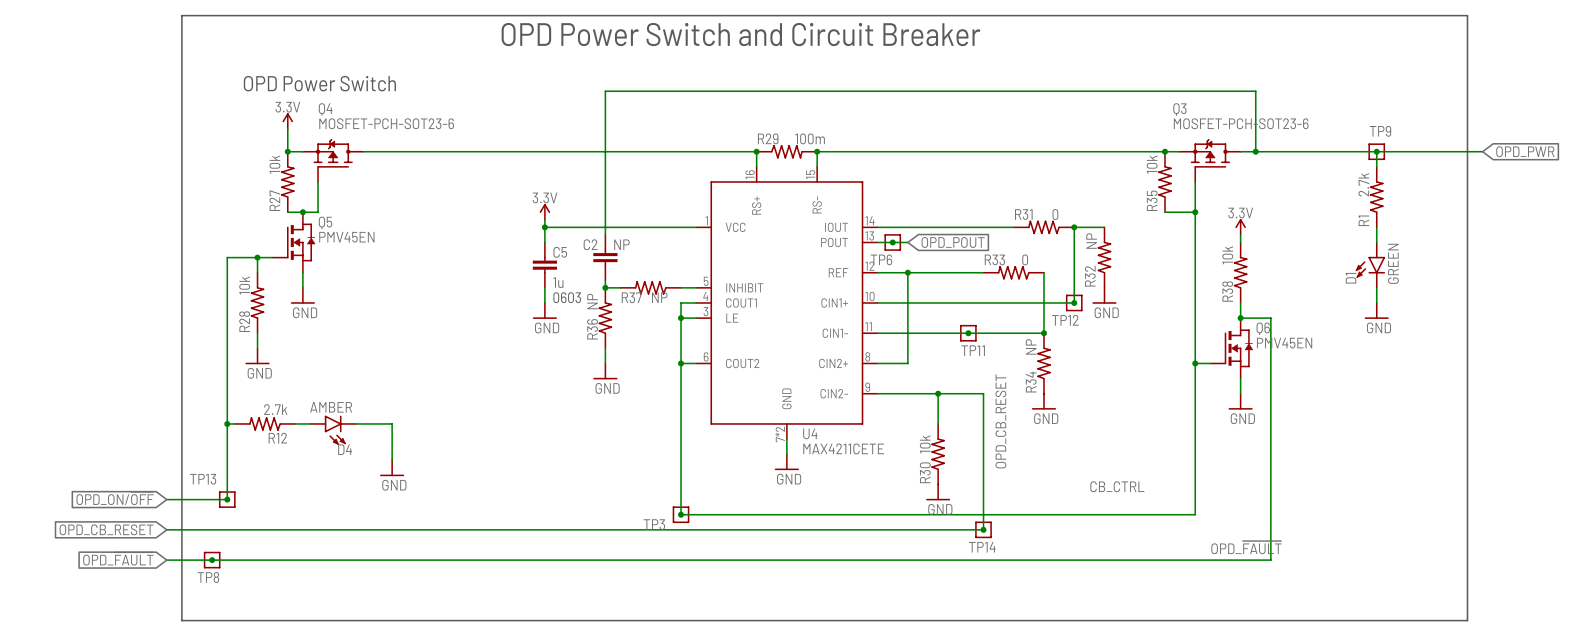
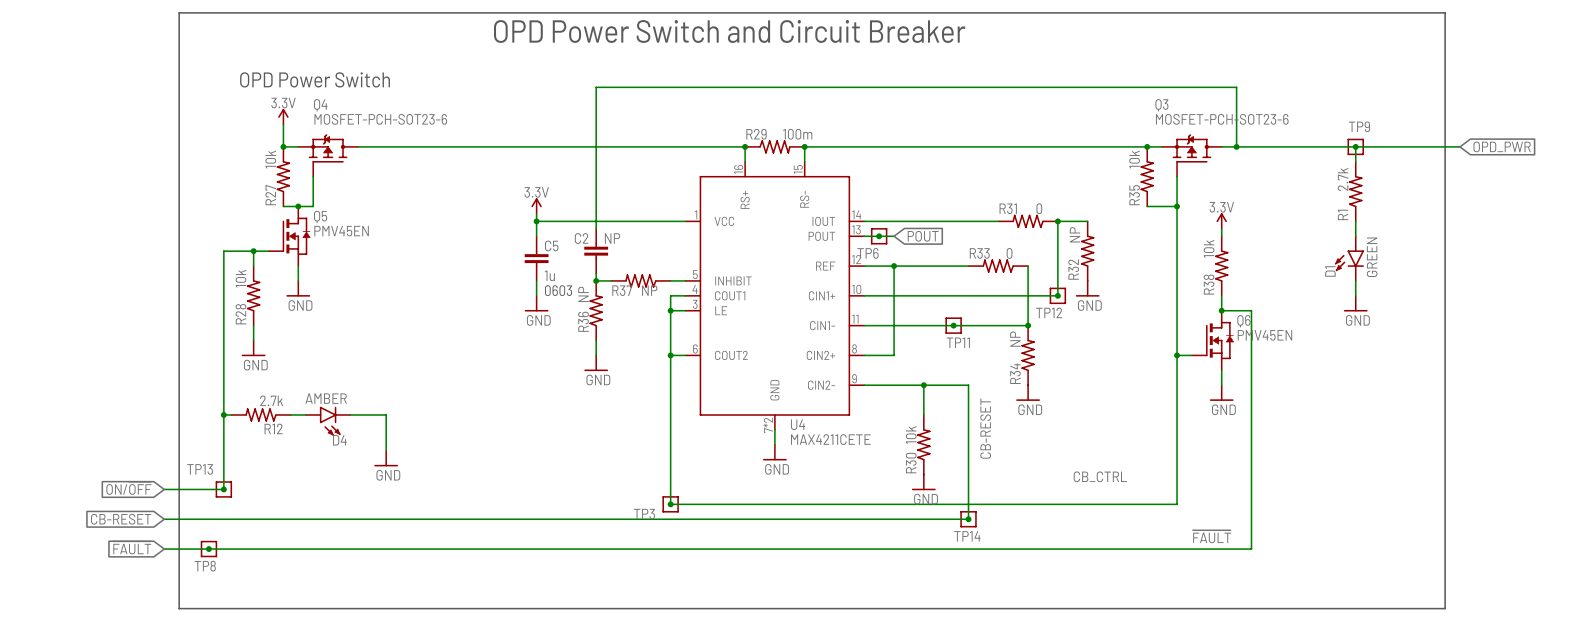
global label: OPD_POUT (953, 242) -> POUT (923, 236)
label: OPD_CB_RESET (1000, 421) -> CB-RESET (985, 428)
global label: OPD_ON/~{OFF} (115, 498) -> ON/~{OFF} (128, 488)
global label: OPD_CB_RESET (106, 529) -> CB-RESET (121, 519)
label: OPD_~{FAULT} (1246, 547) -> ~{FAULT} (1211, 536)
global label: OPD_~{FAULT} (118, 558) -> ~{FAULT} (132, 547)

